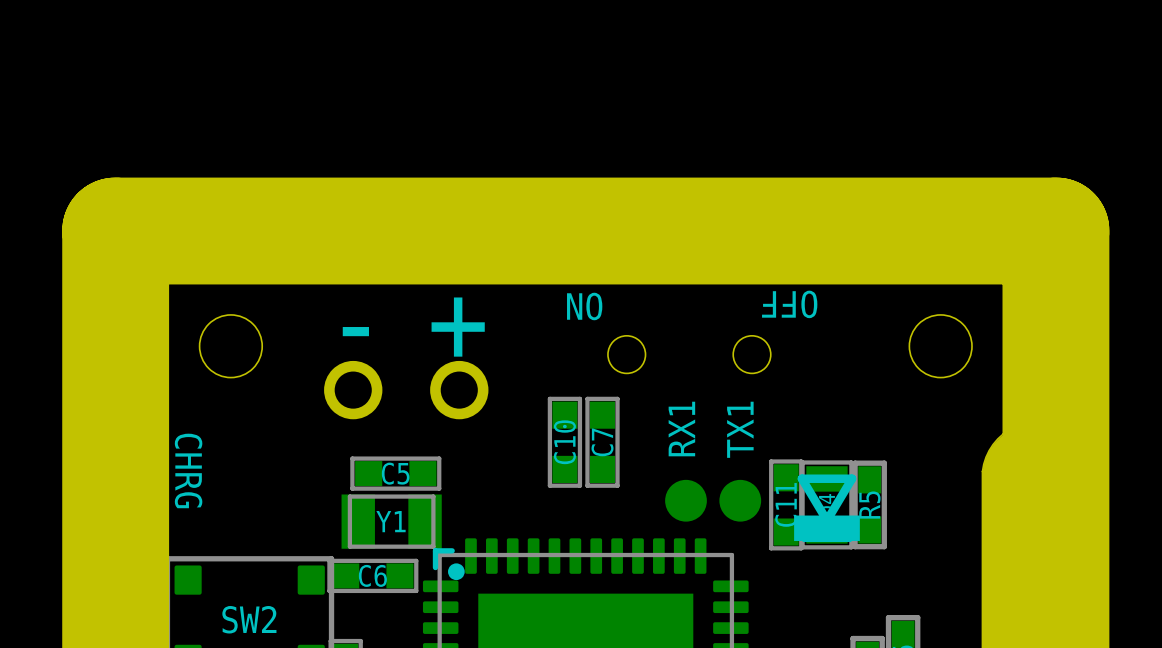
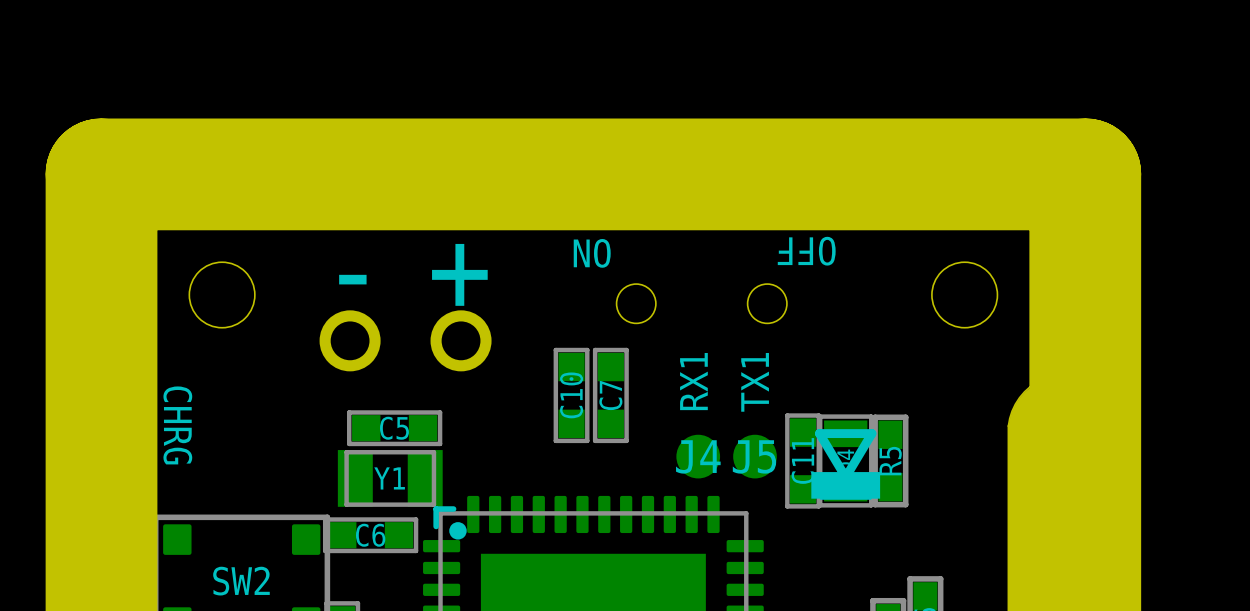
J4 name: none -> J4 (698, 456)
J5 name: none -> J5 (754, 456)

